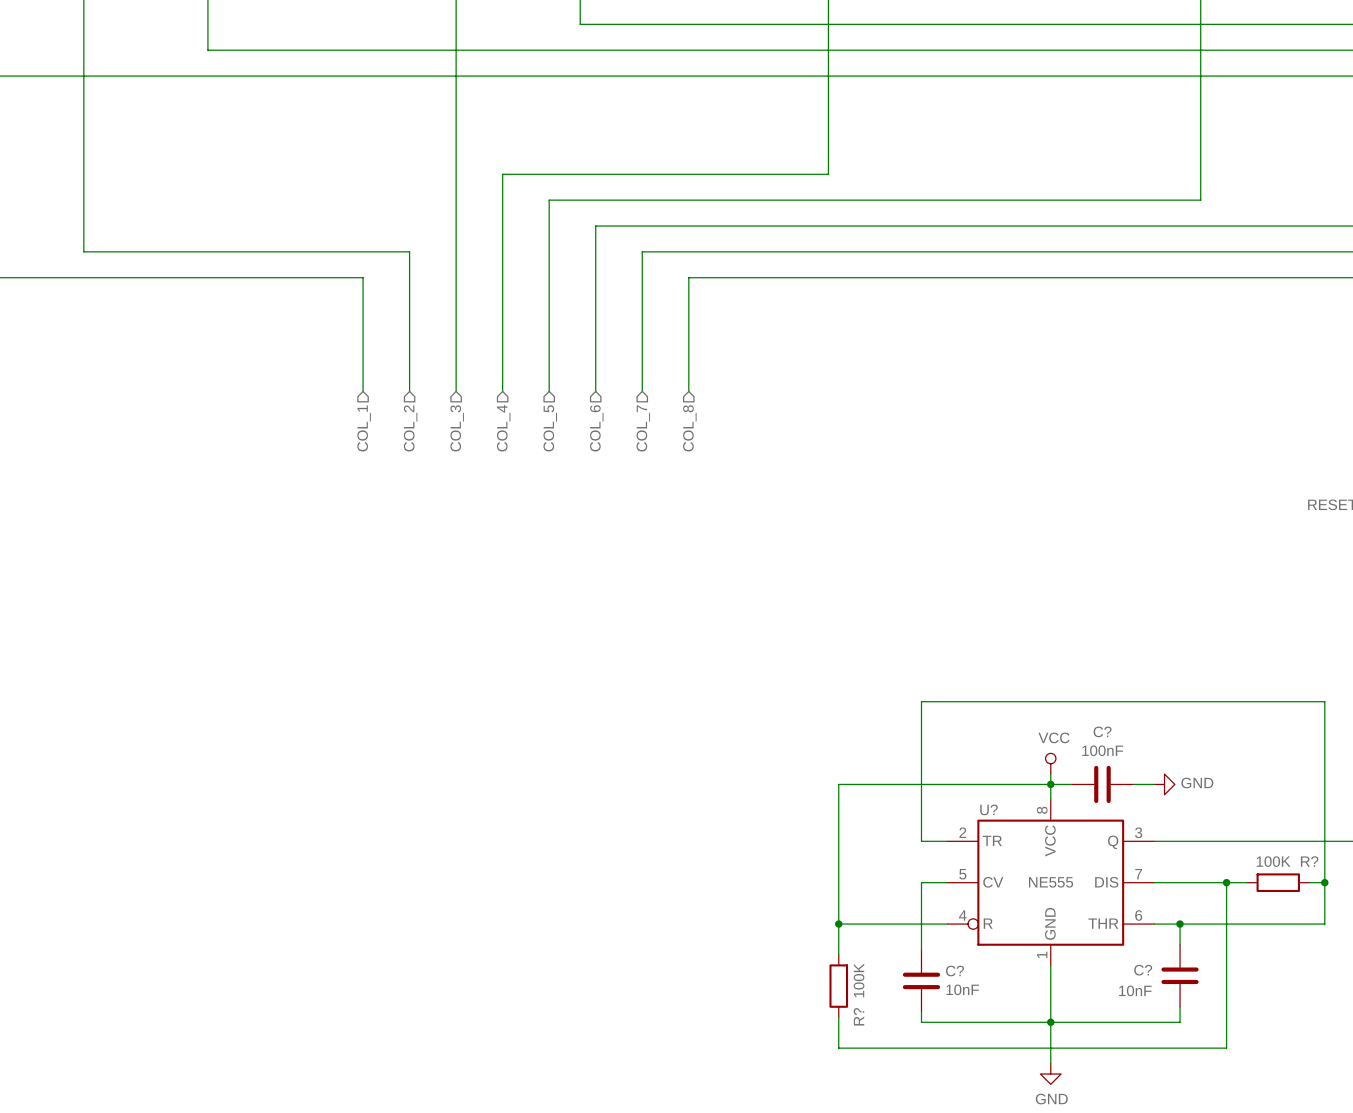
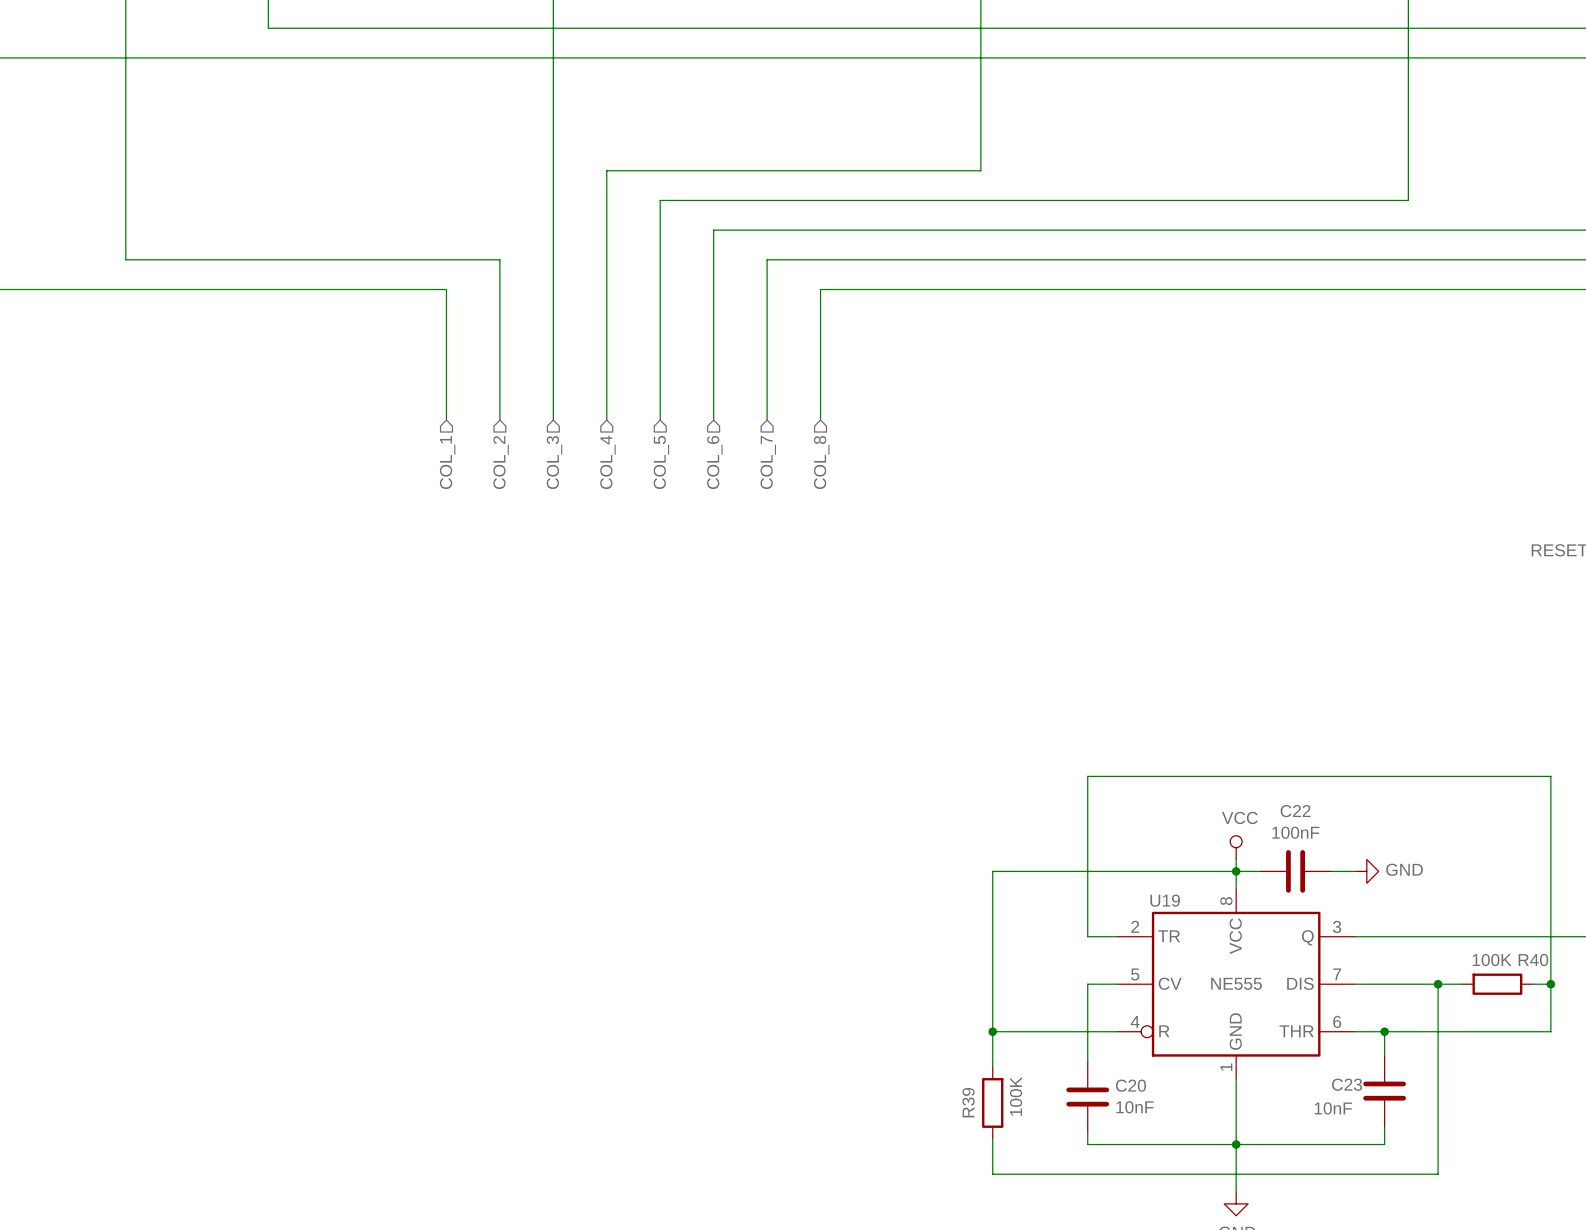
C? name: C? (1102, 731) -> C22 (1295, 811)
U? name: U? (989, 809) -> U19 (1165, 900)
R? name: R? (1309, 861) -> R40 (1533, 960)
C? name: C? (1143, 970) -> C23 (1347, 1084)
C? name: C? (954, 971) -> C20 (1130, 1085)
R? name: R? (858, 1016) -> R39 (968, 1102)

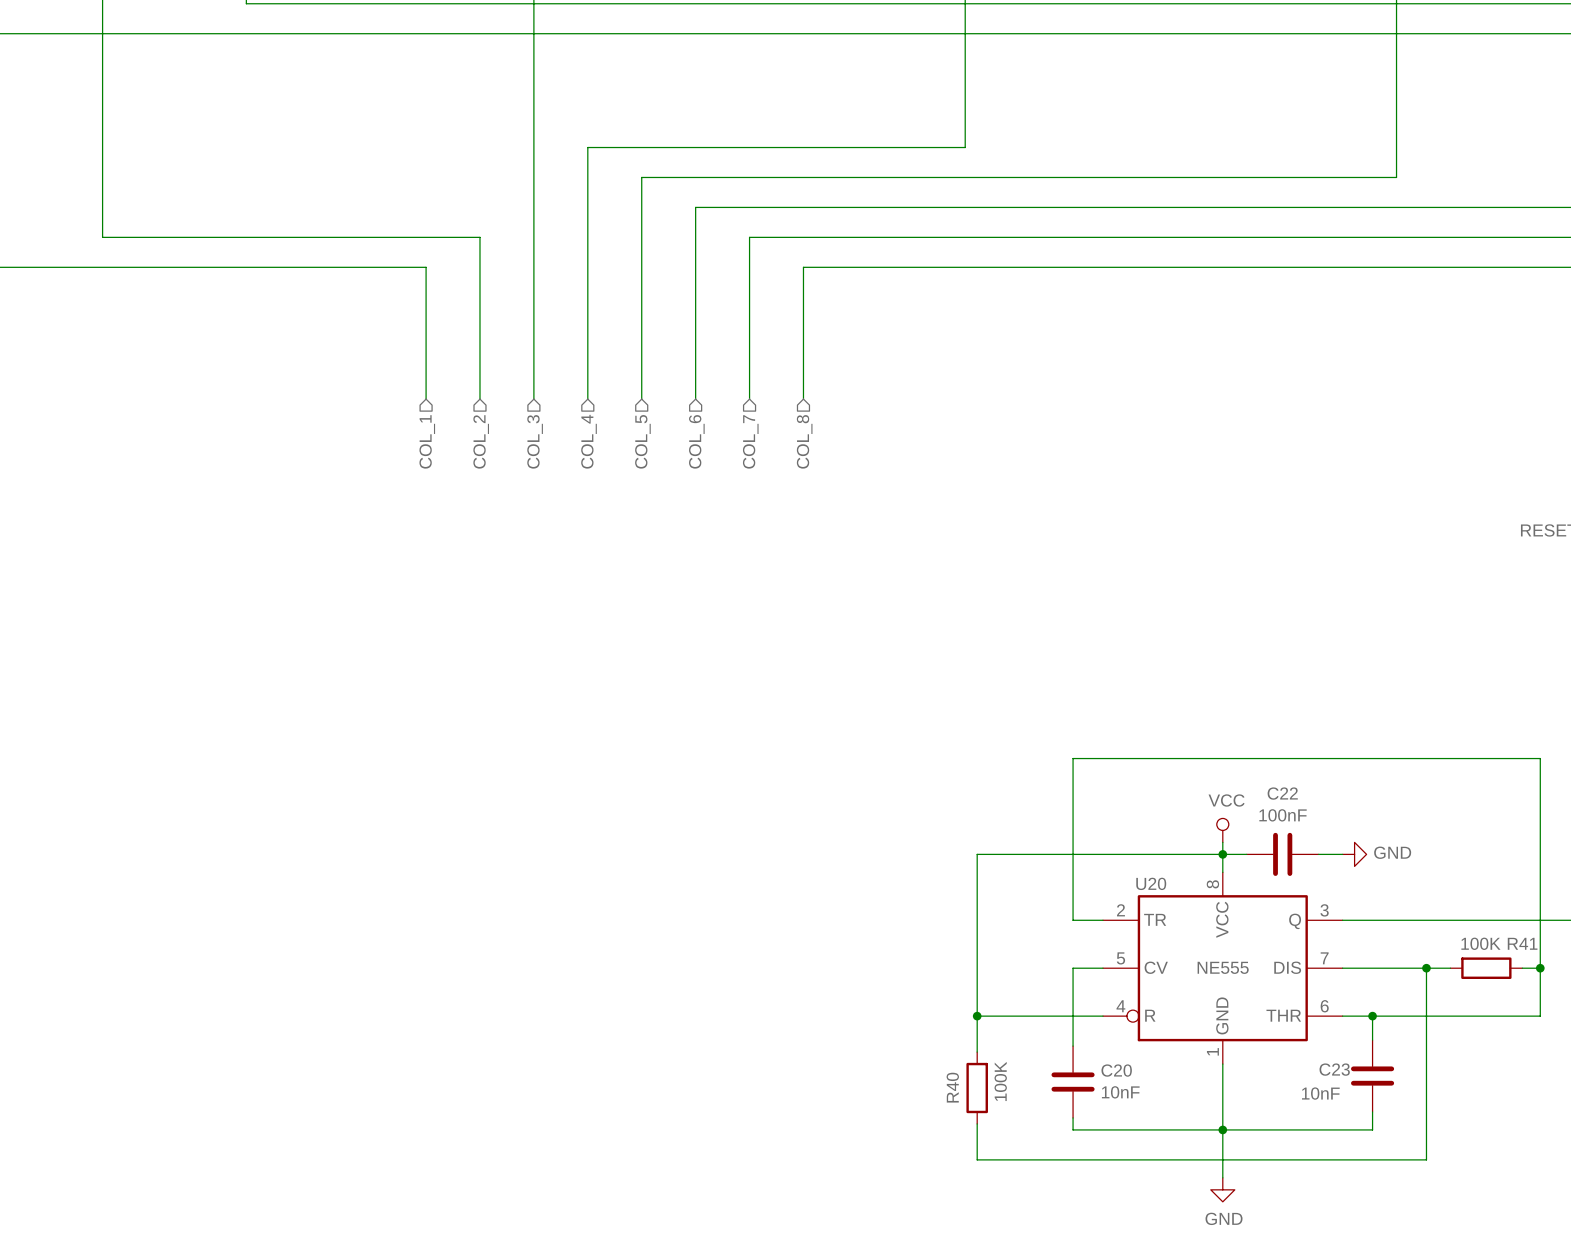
U19 name: U19 (1165, 900) -> U20 (1151, 883)
R40 name: R40 (1533, 960) -> R41 (1522, 943)
R39 name: R39 (968, 1102) -> R40 (952, 1087)

